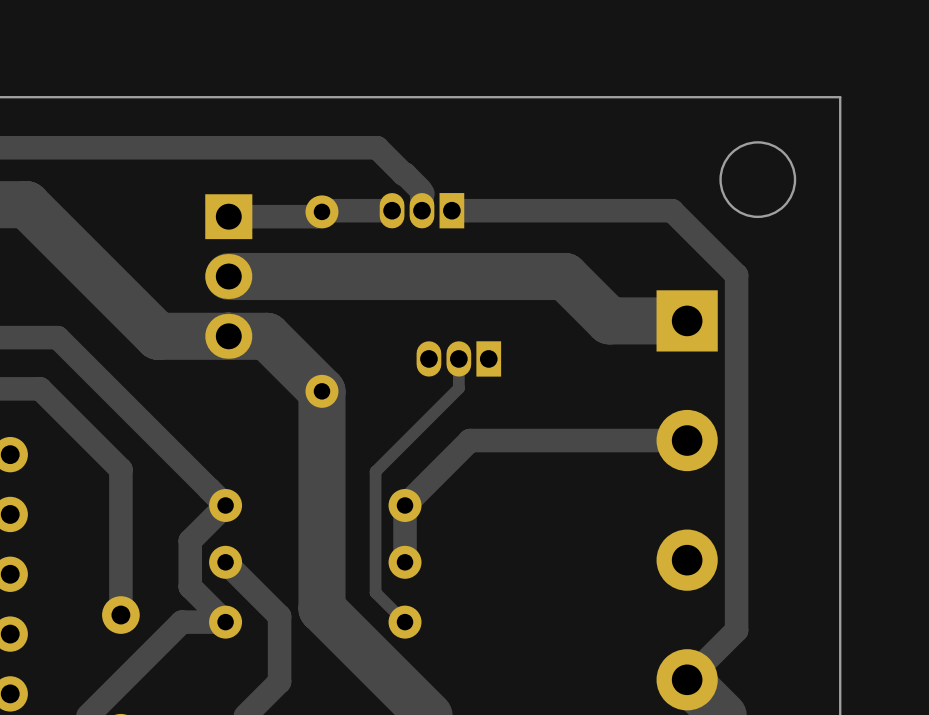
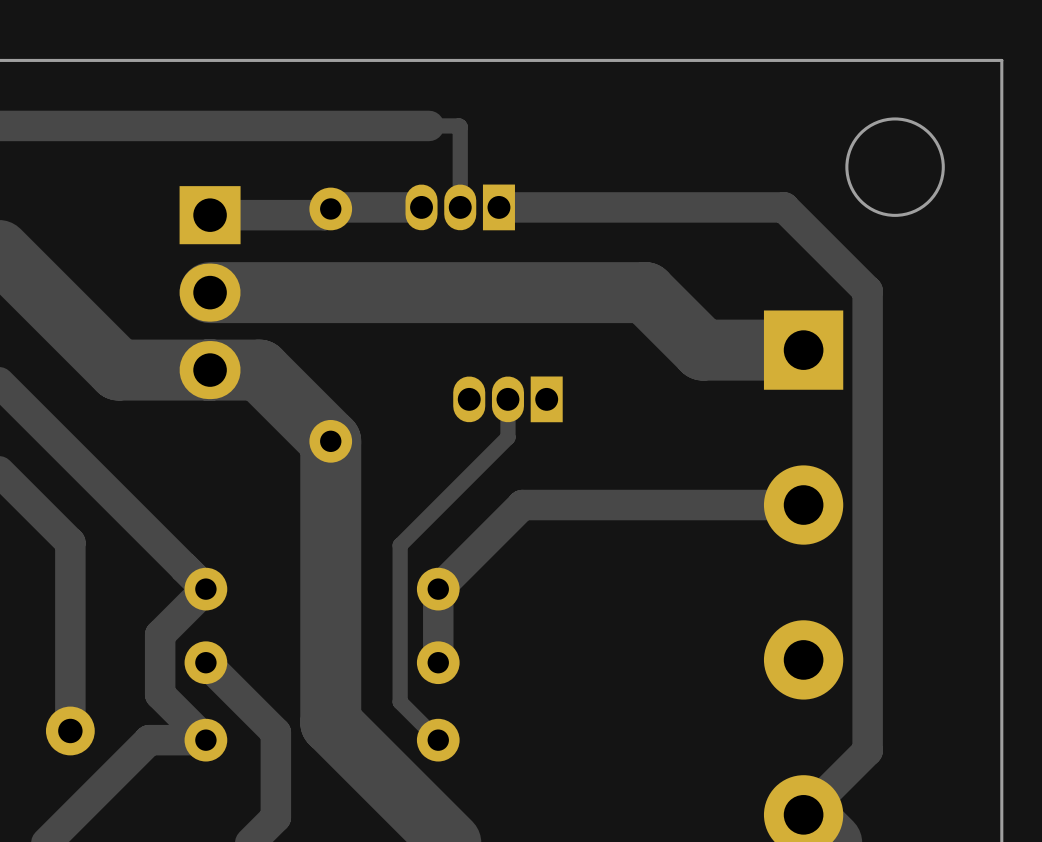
track: (377, 147) (422, 192) (421, 194) -> (402, 125) (460, 127) (460, 186)

